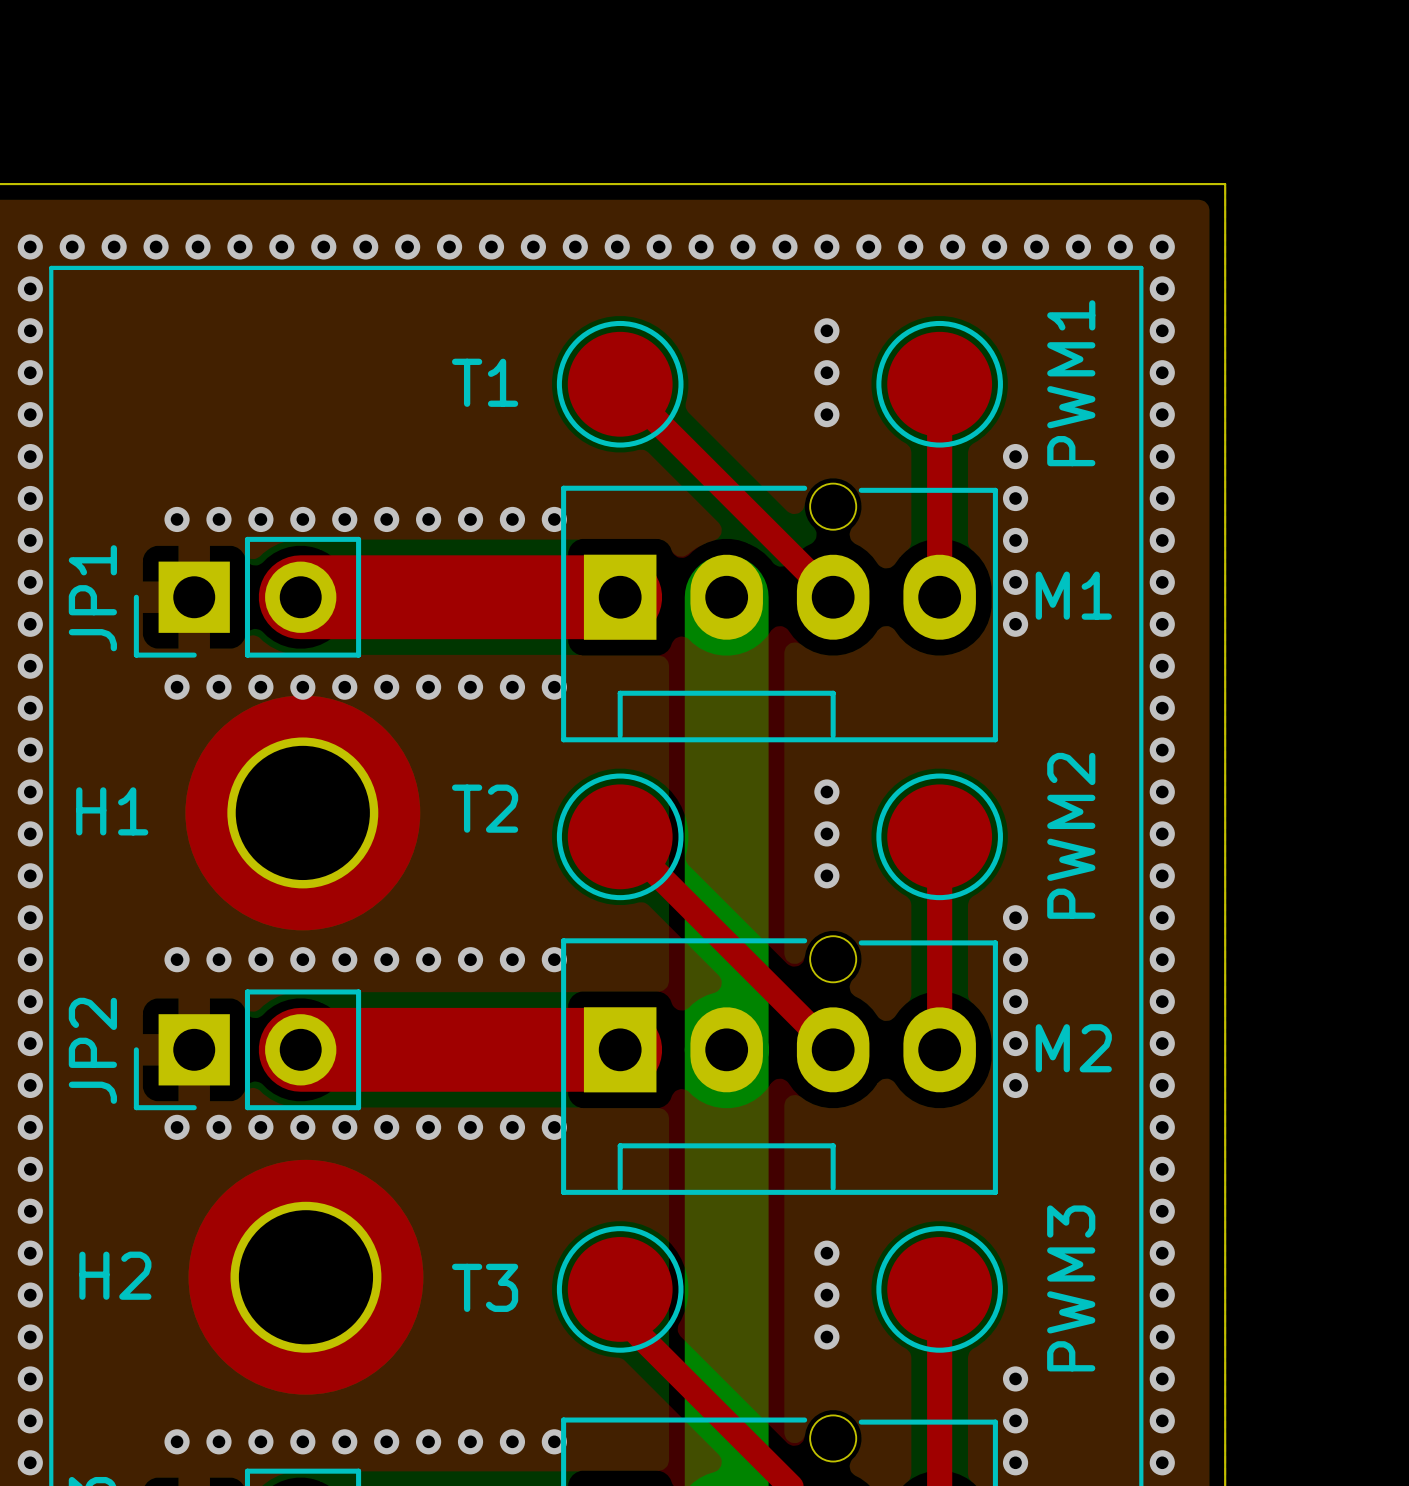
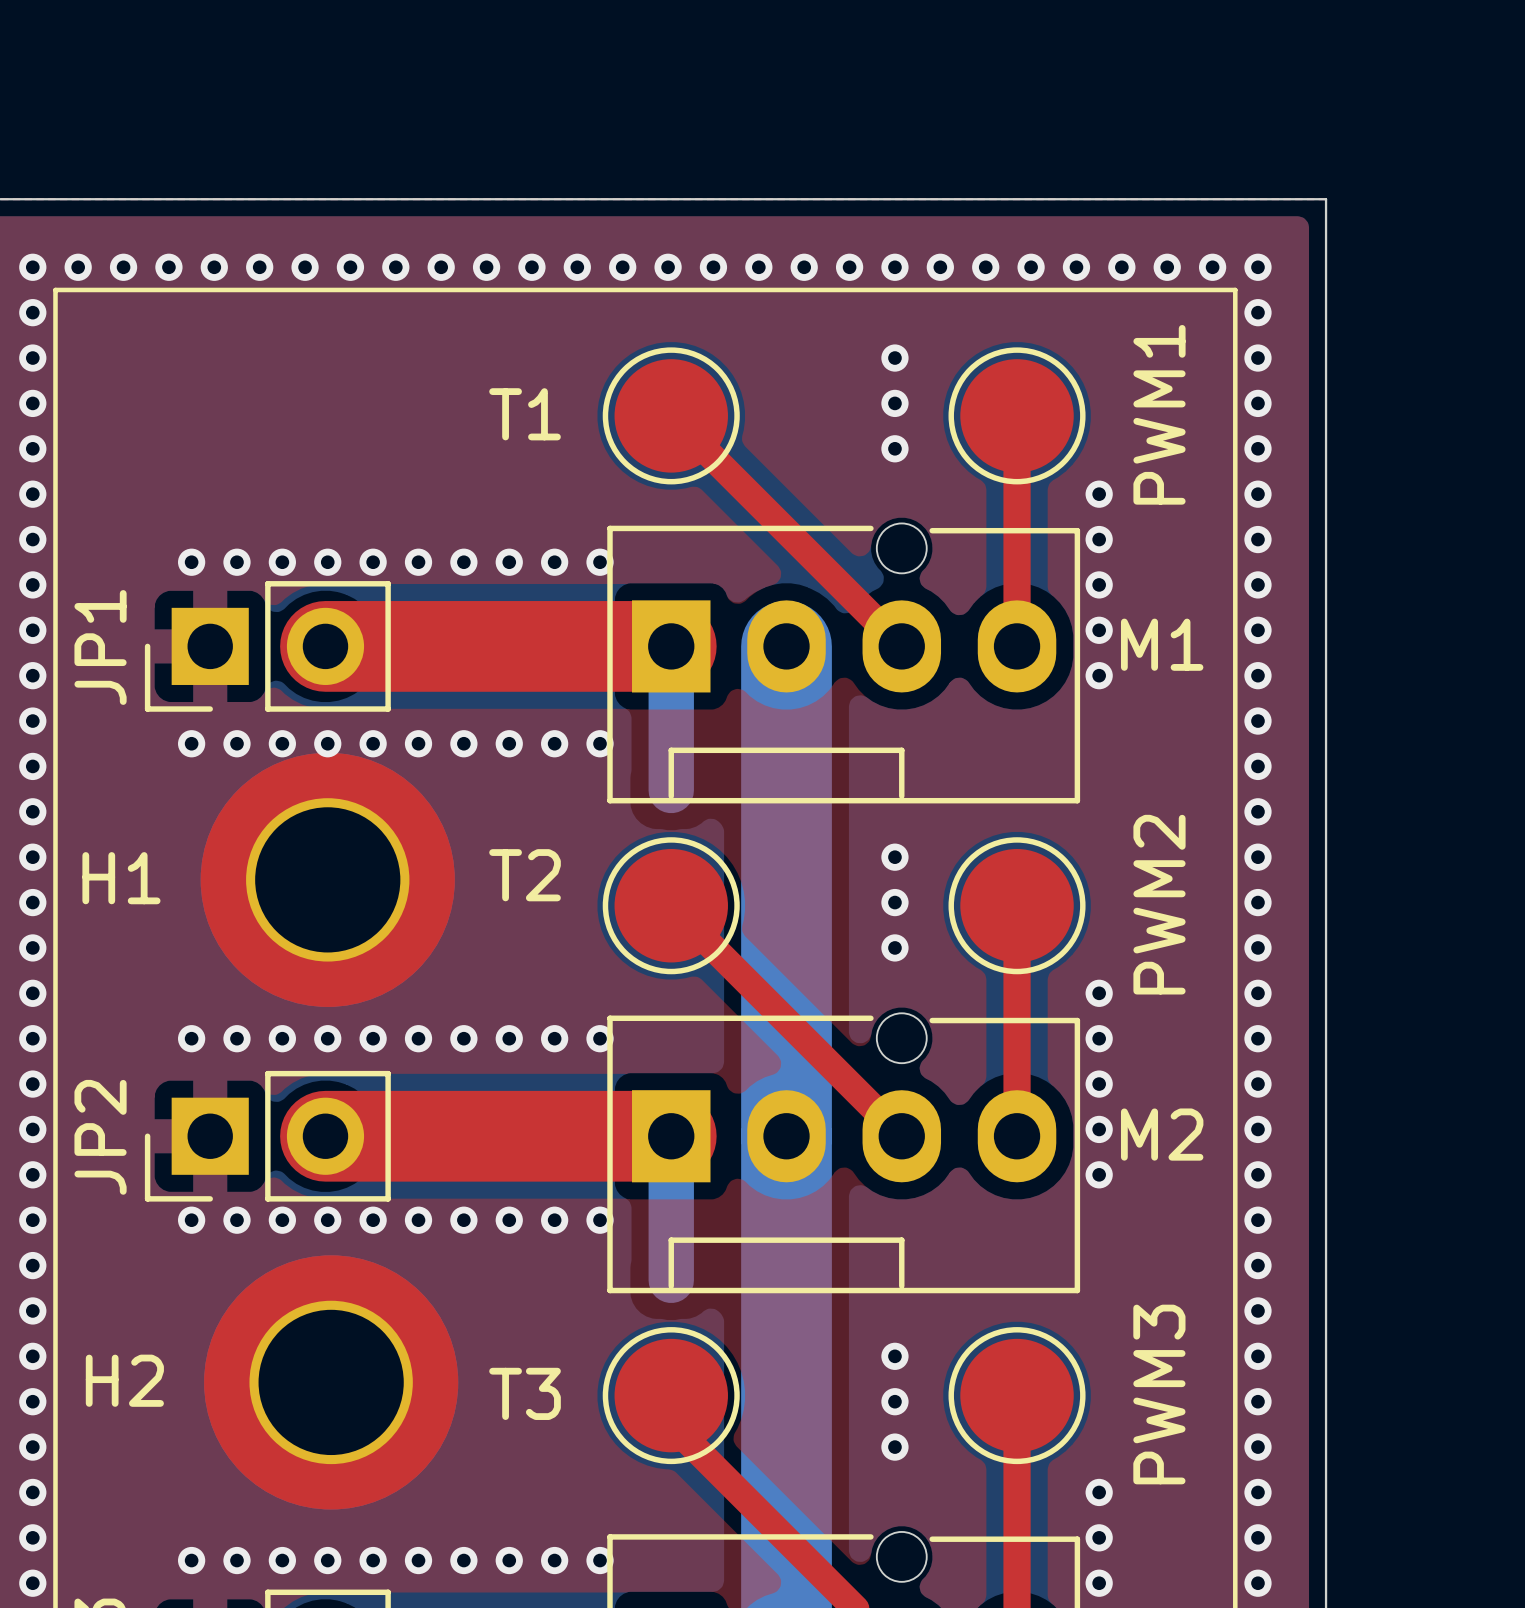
bottom track: none -> (671, 646) (671, 790)
bottom track: none -> (671, 1136) (671, 1280)

